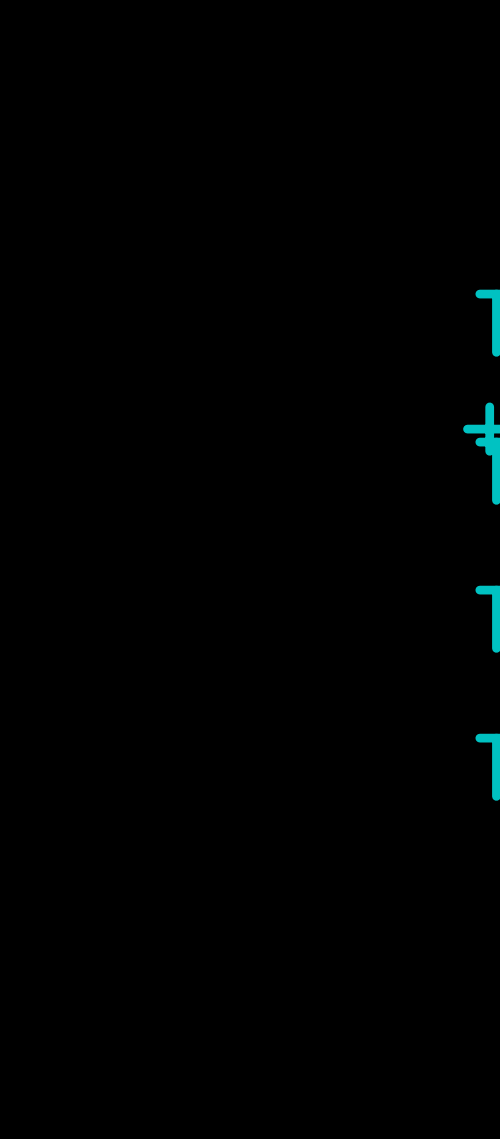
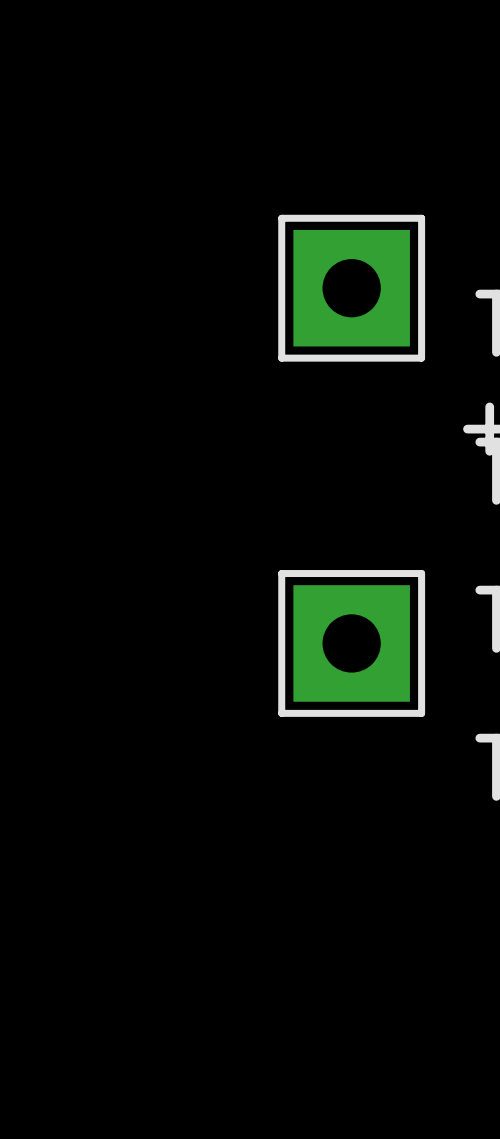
part: none -> (351, 288)
part: none -> (351, 643)

